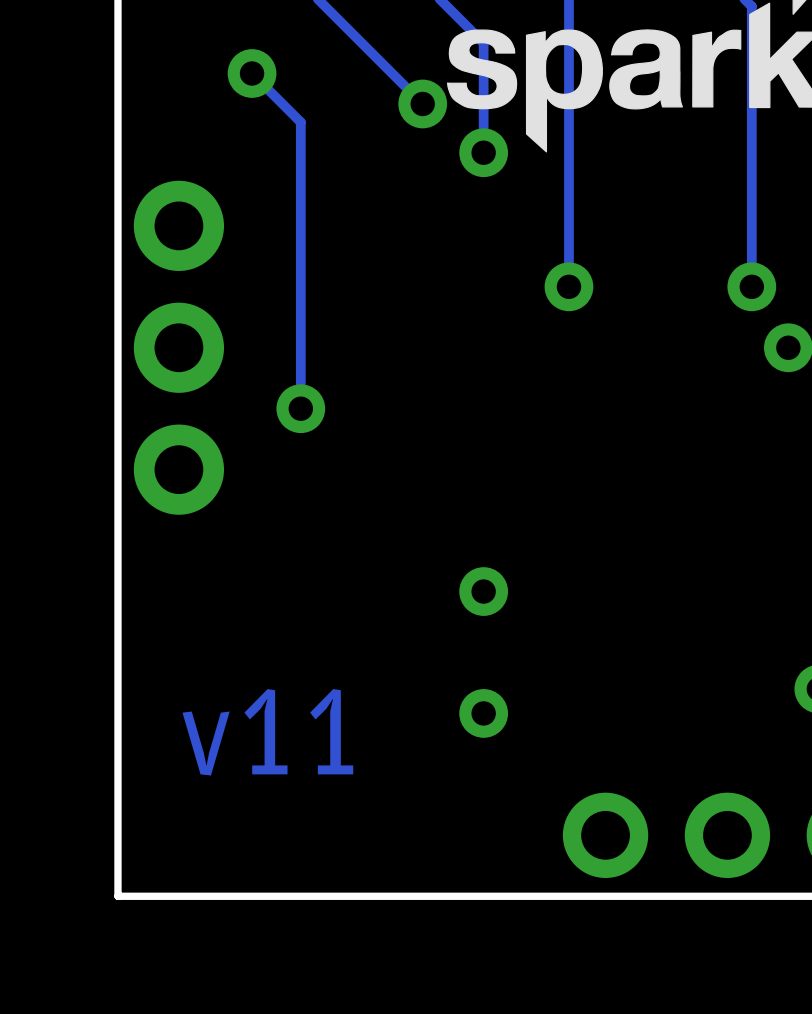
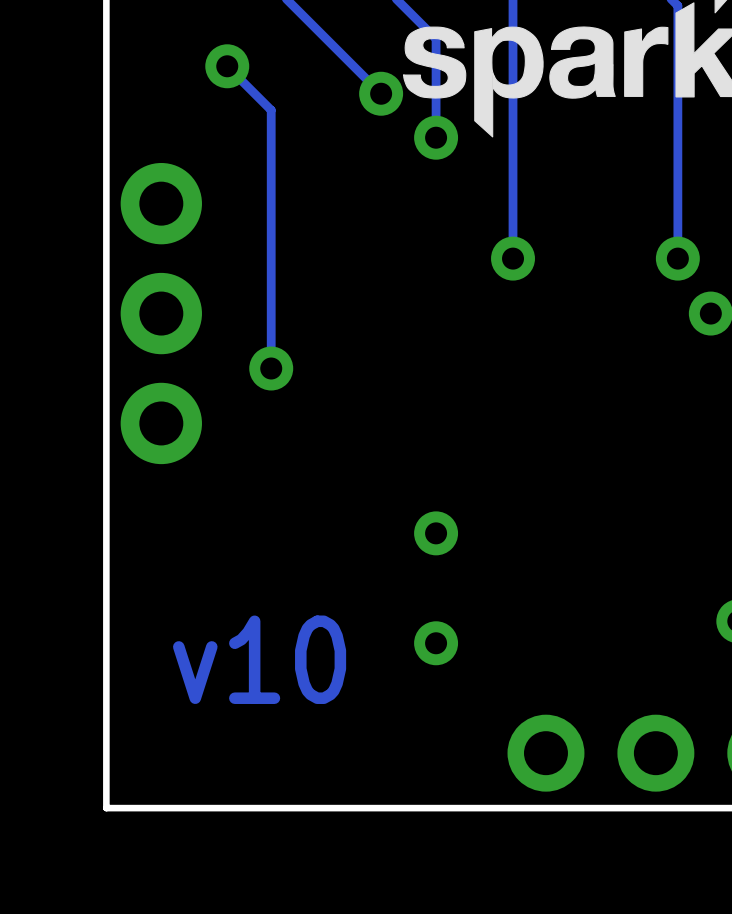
text: v11 (267, 732) -> v10 (259, 659)

